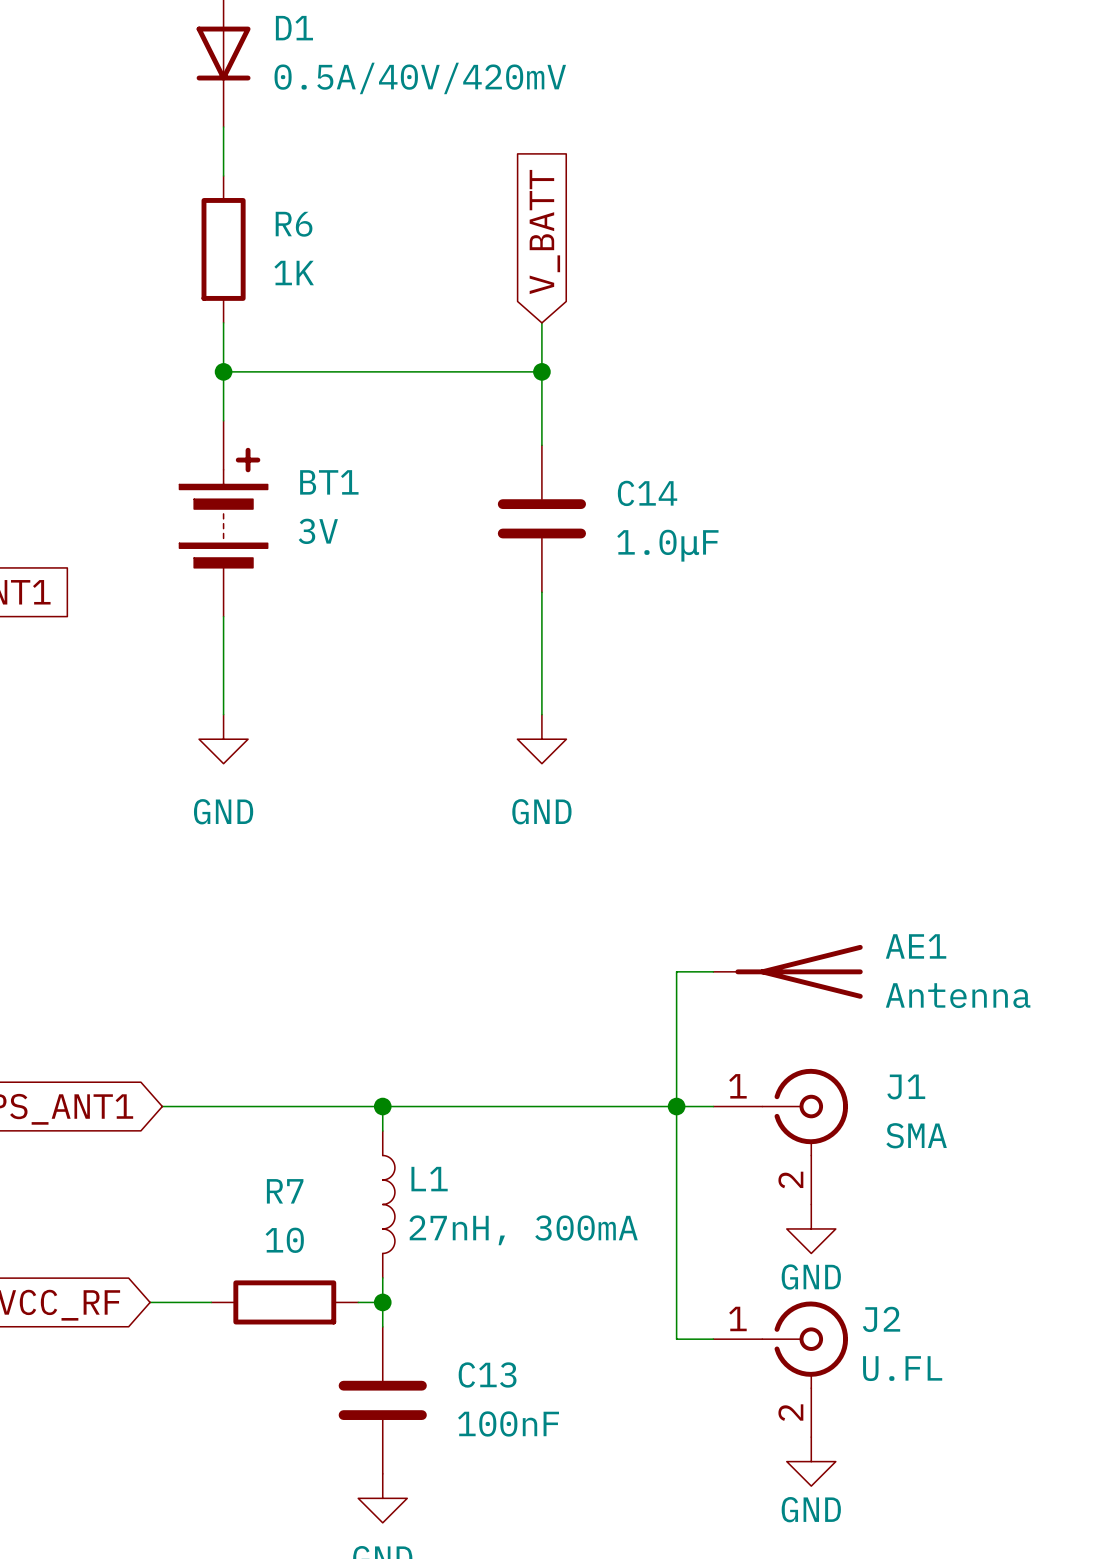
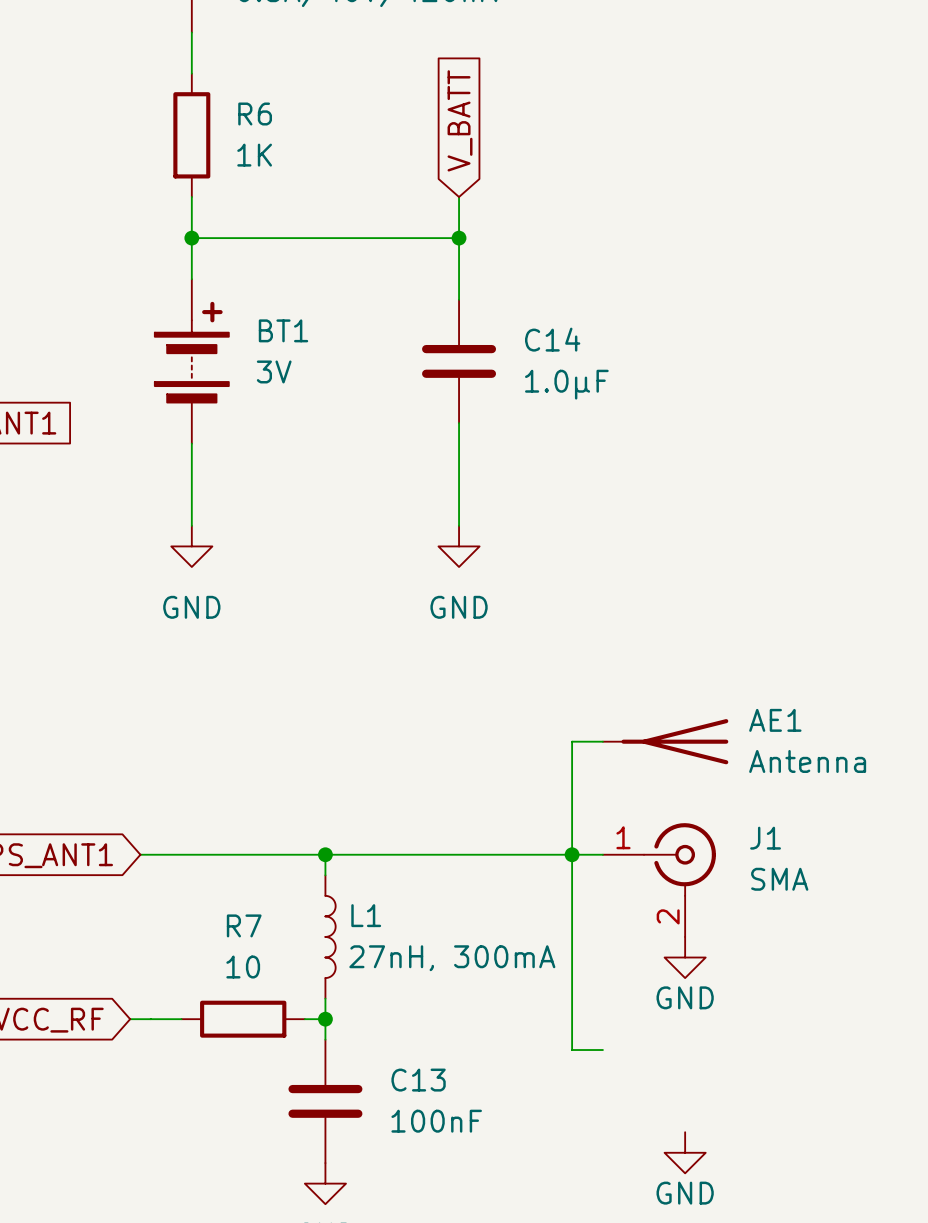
J2: U.FL (780, 1369) -> none

